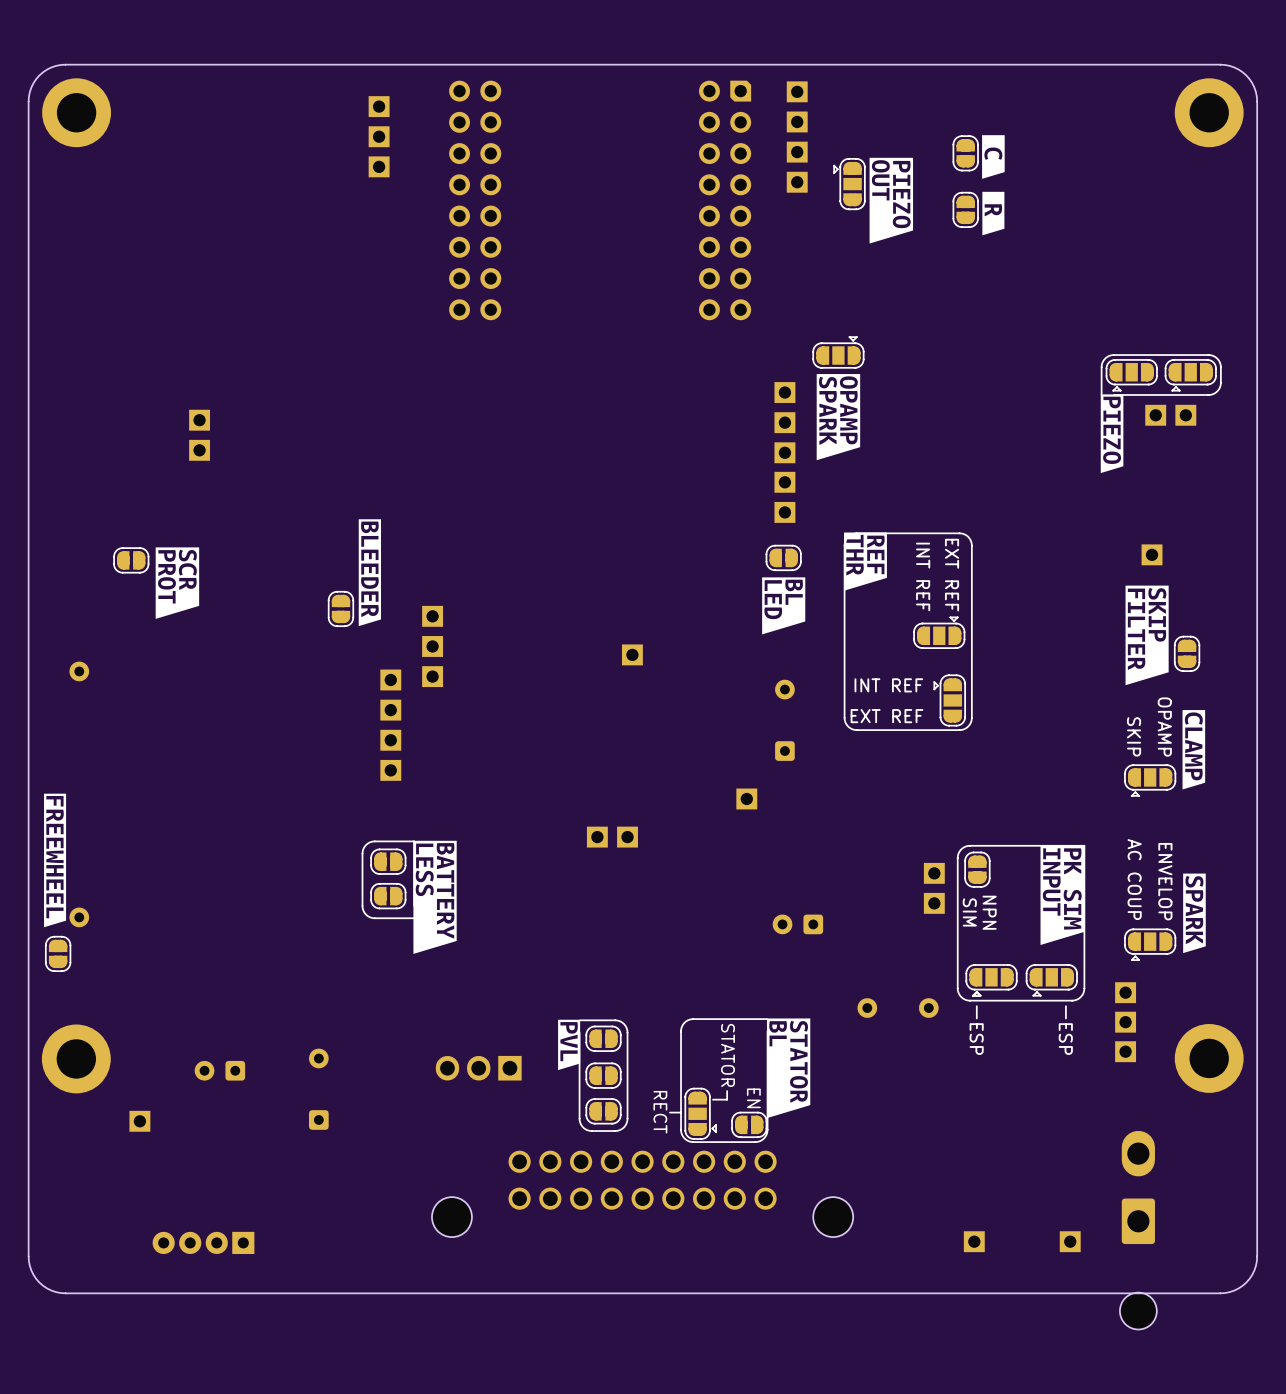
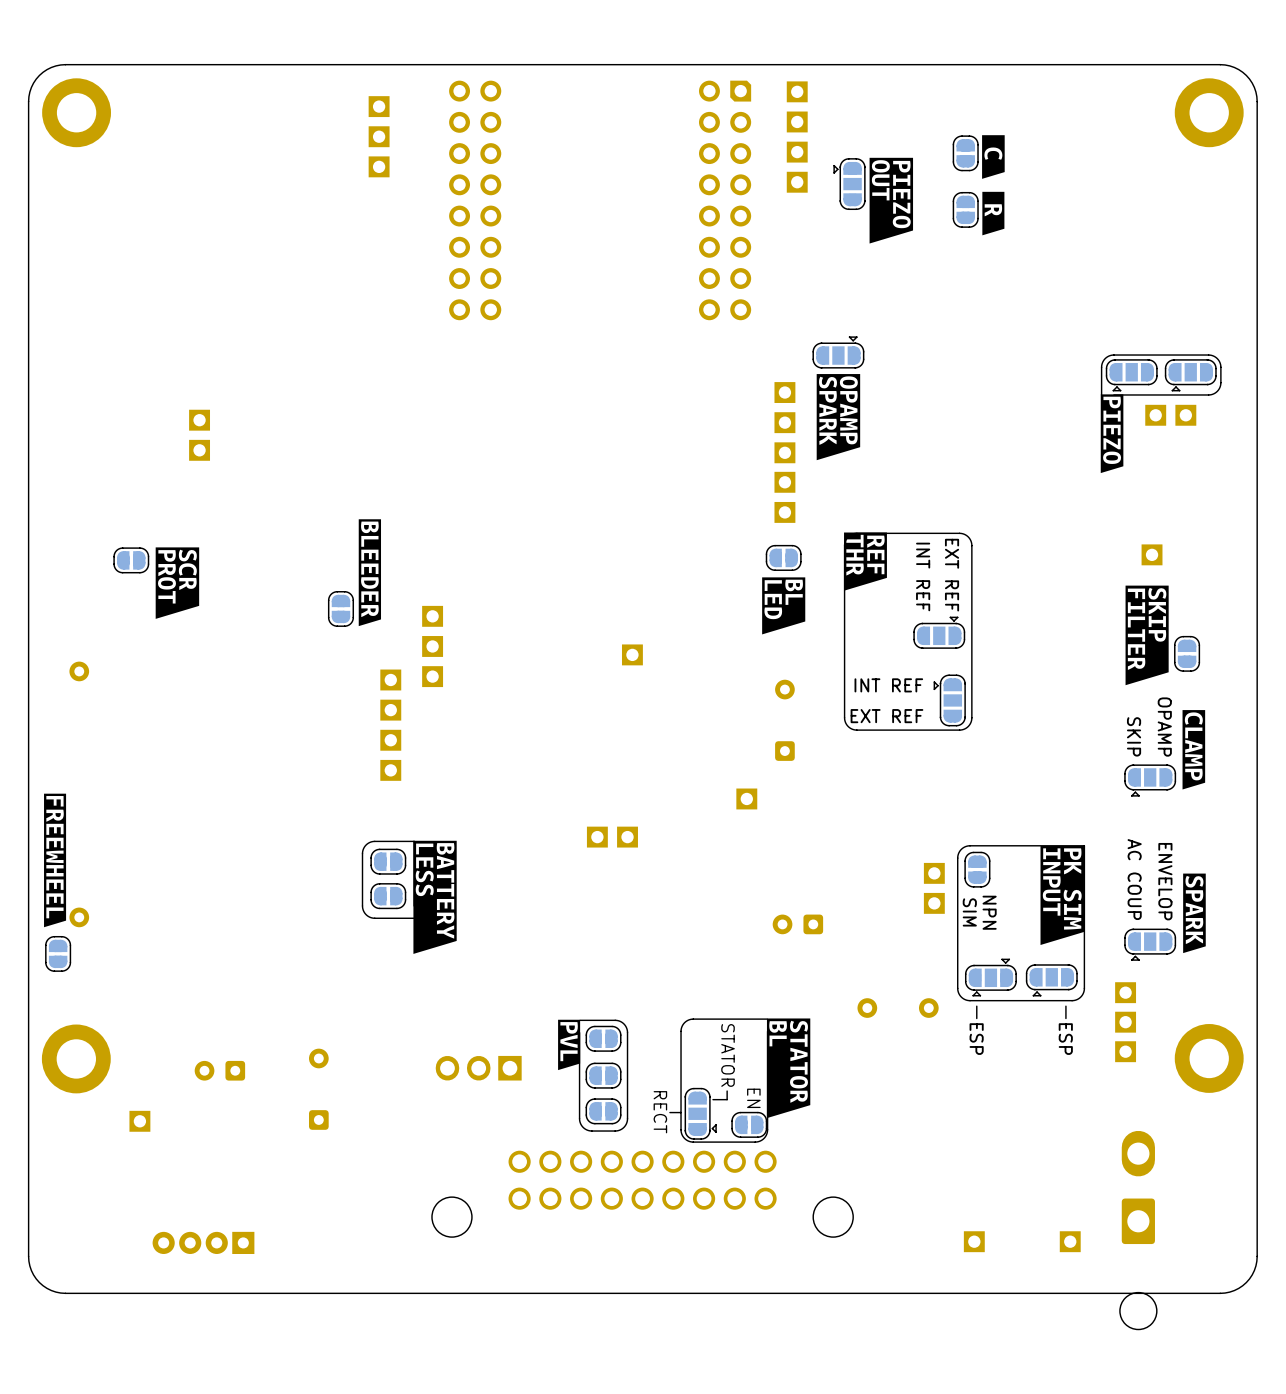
part rotation: 0° (991, 980) -> 180° (990, 974)

